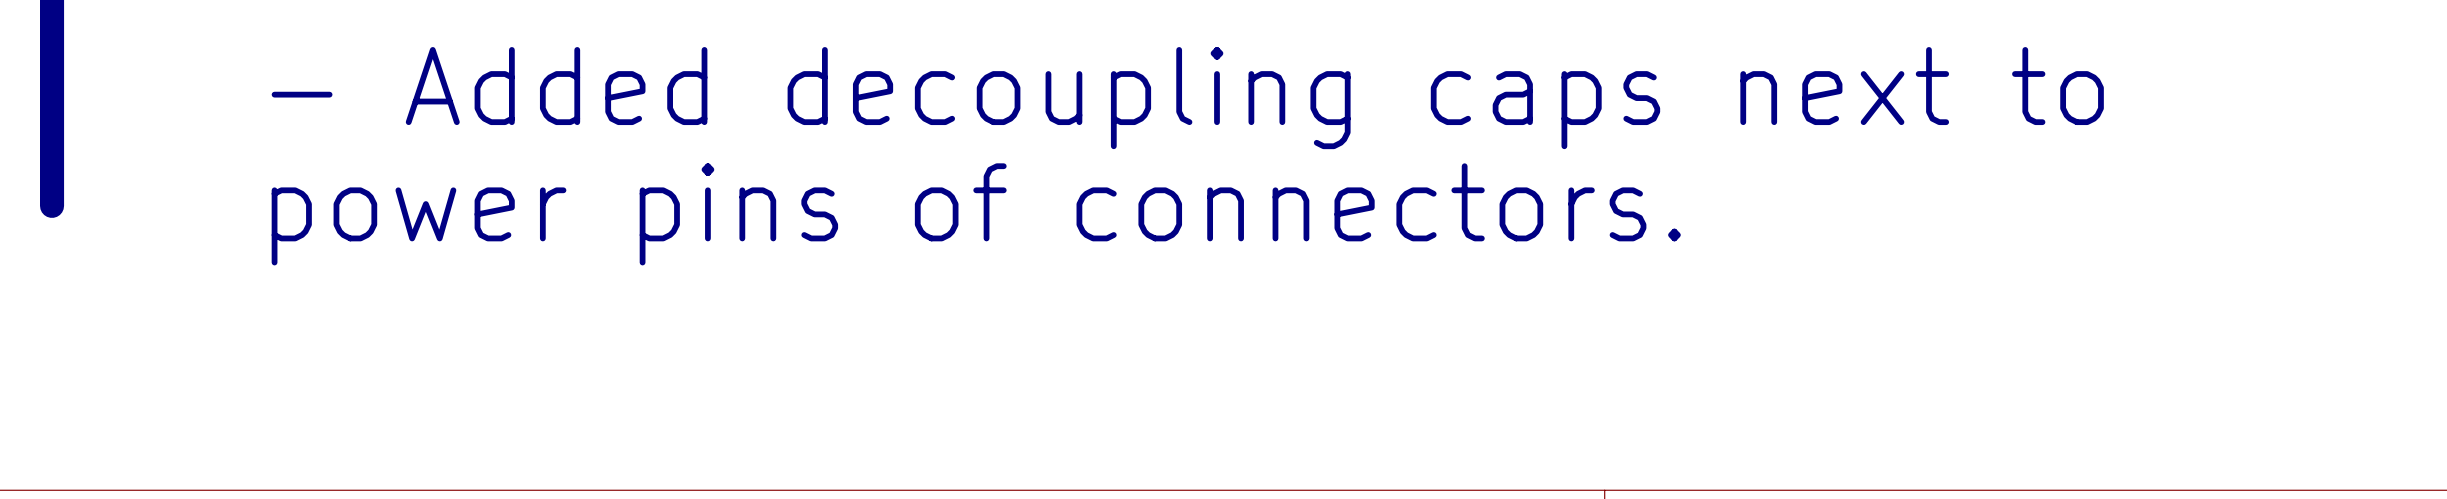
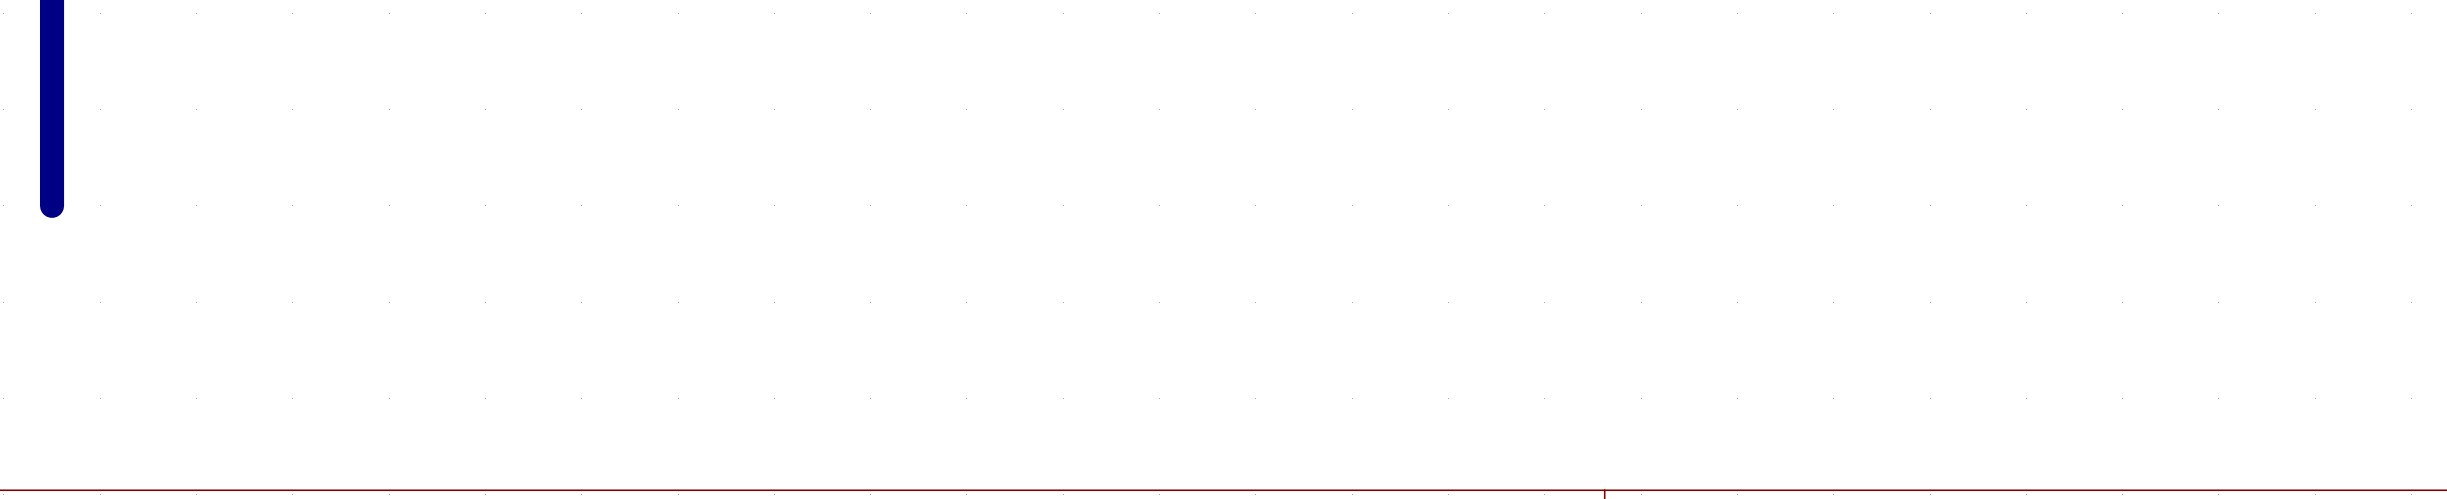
text: - Added decoupling caps next to (1187, 98) -> none
text: power pins of connectors. (976, 214) -> none

